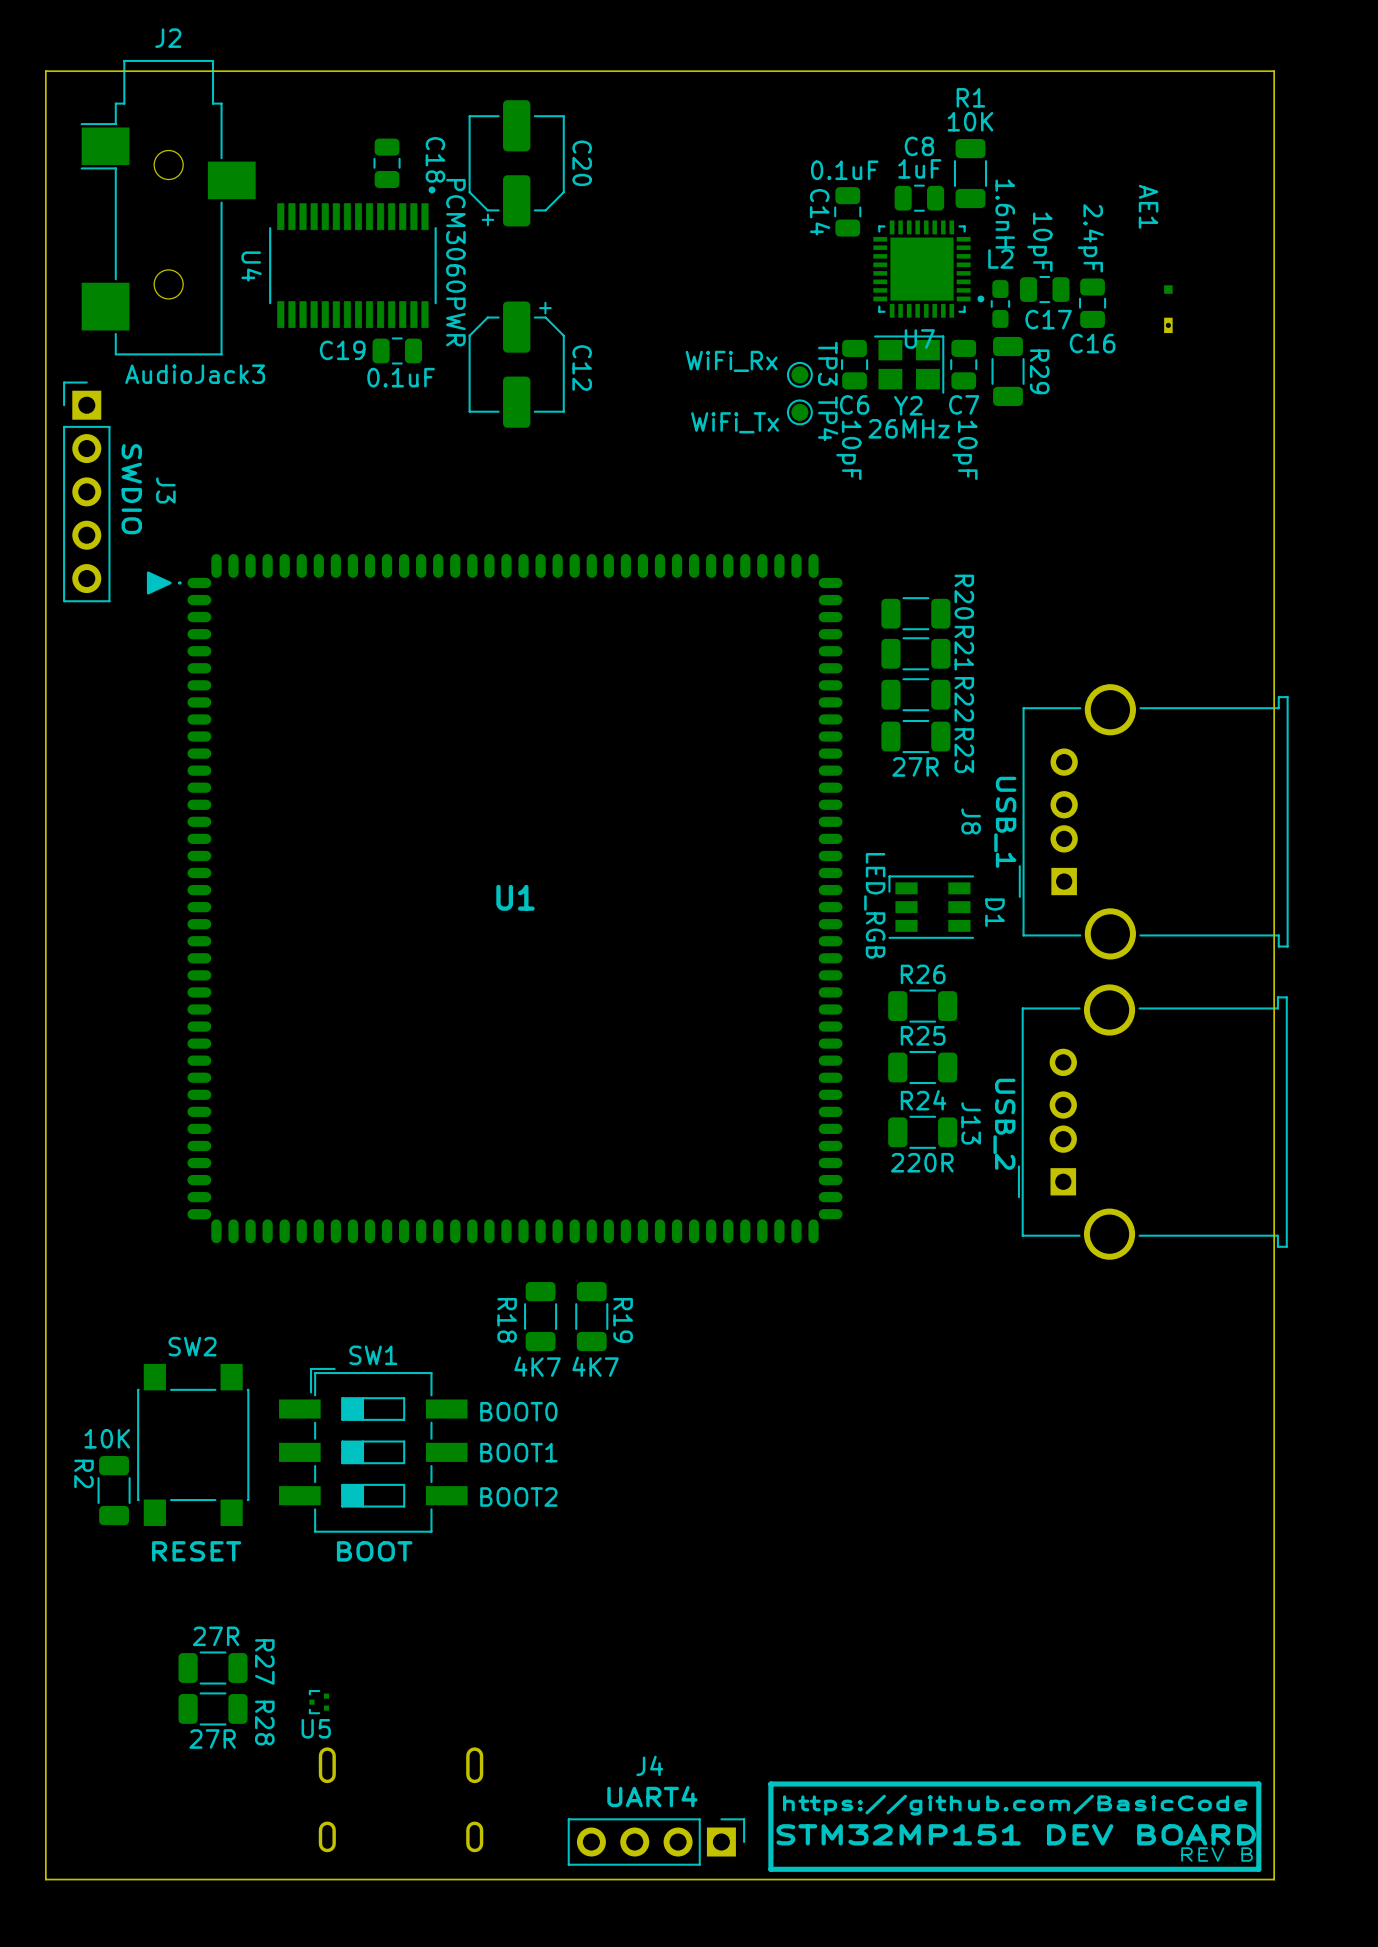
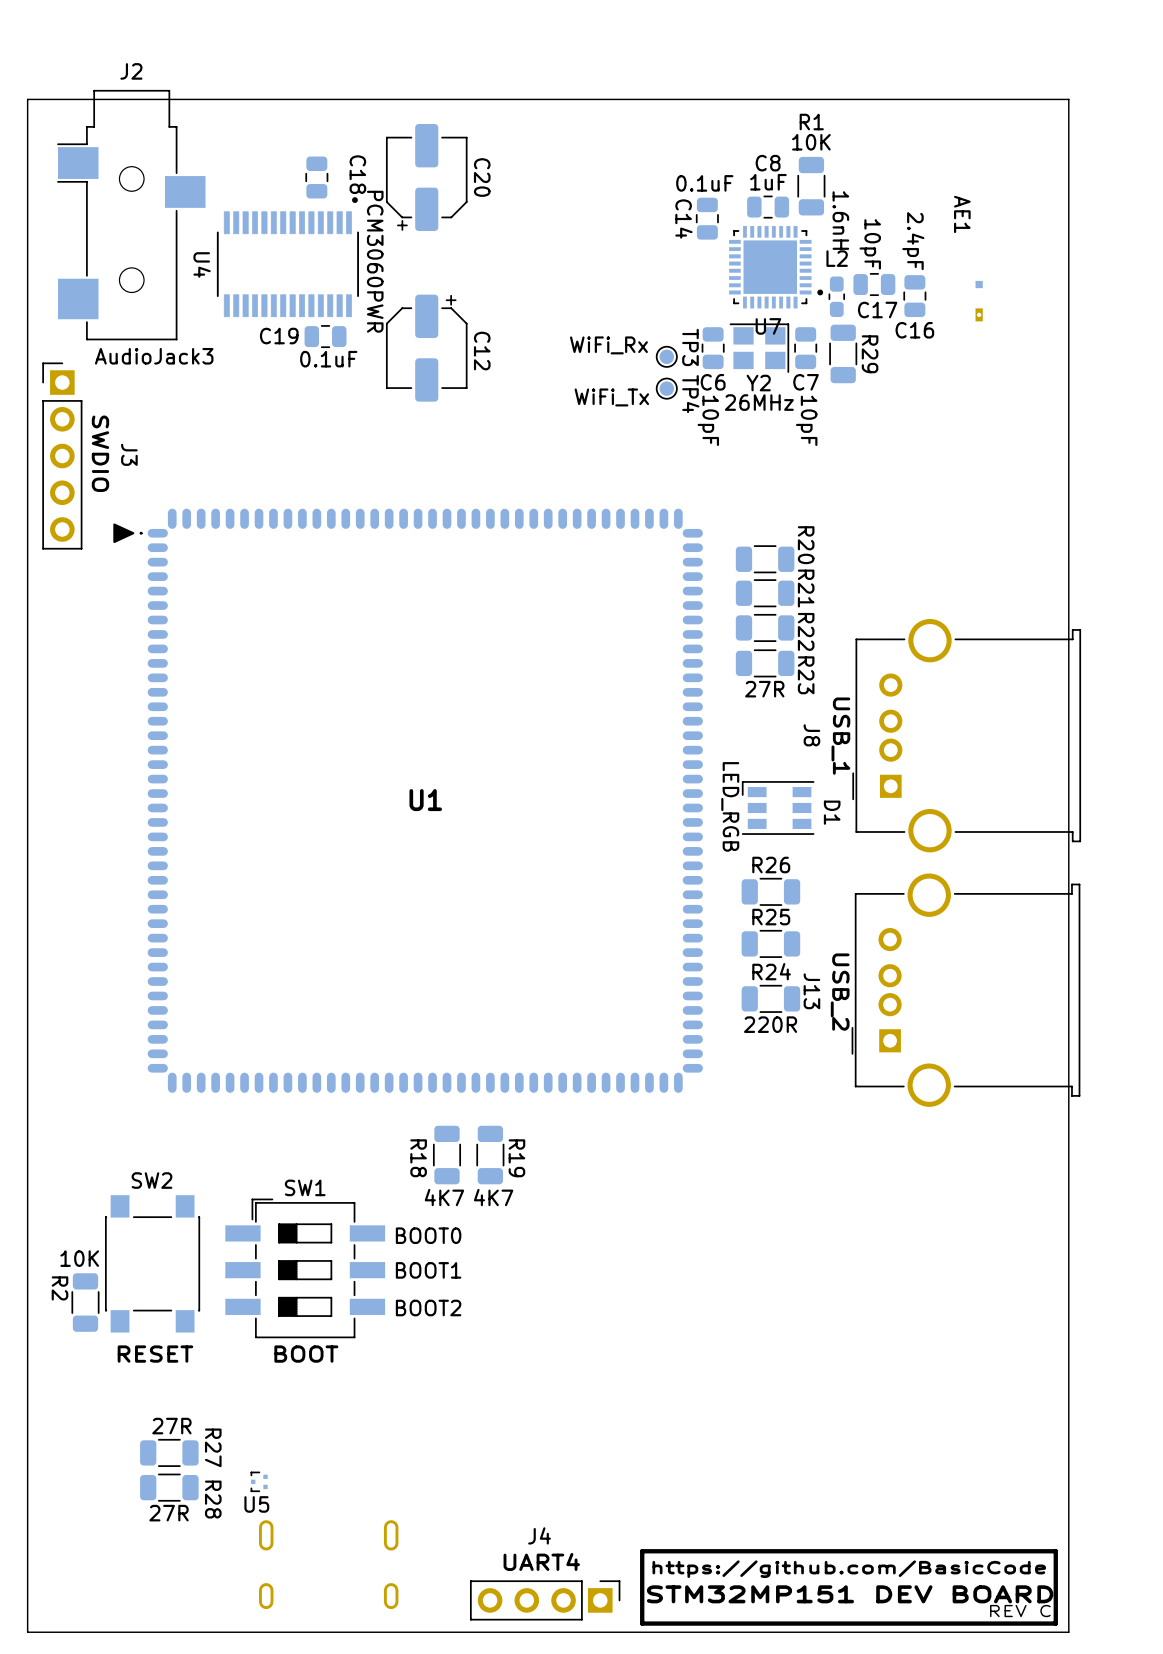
text: REV B (1217, 1854) -> REV C (1020, 1611)

